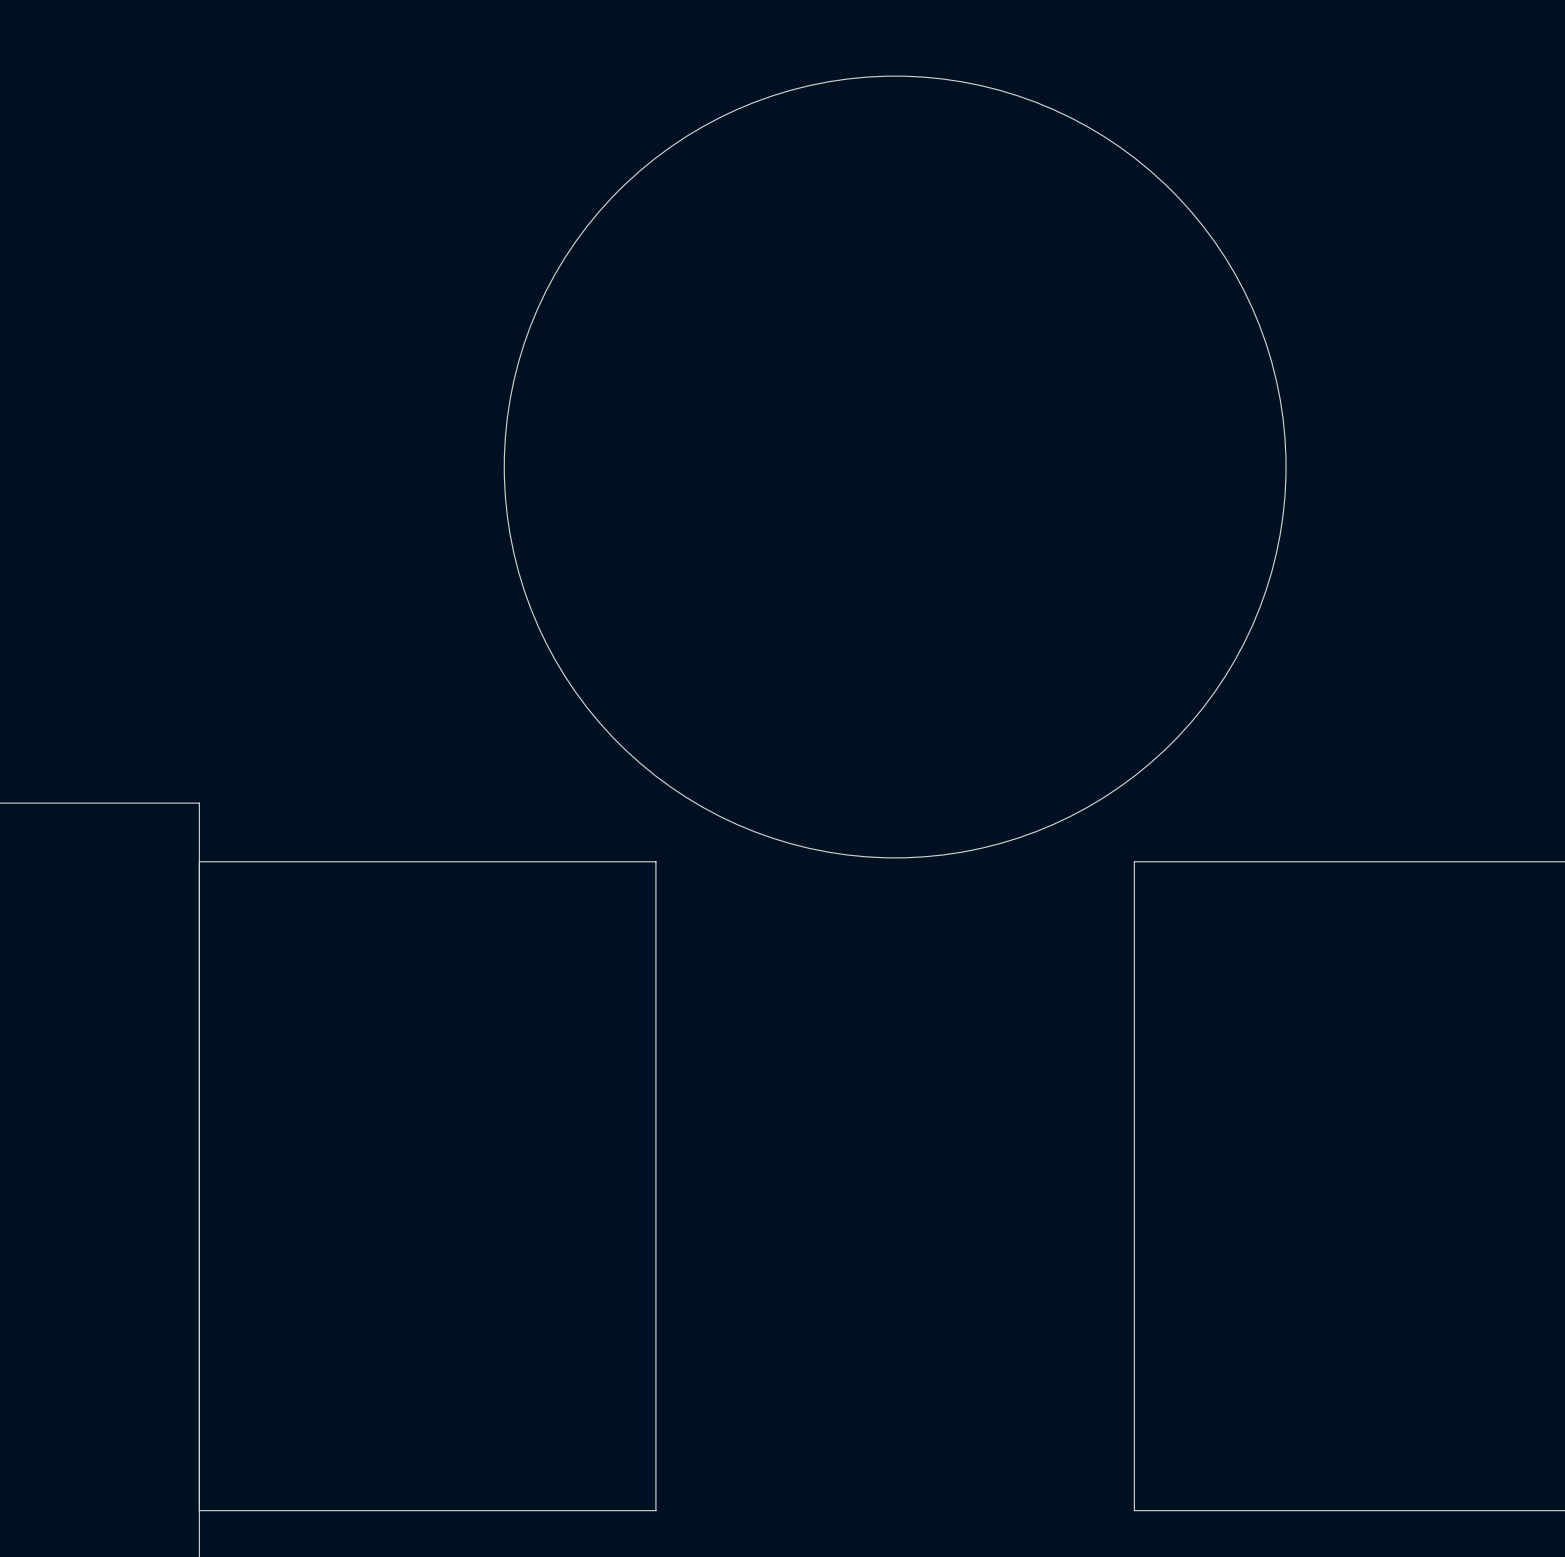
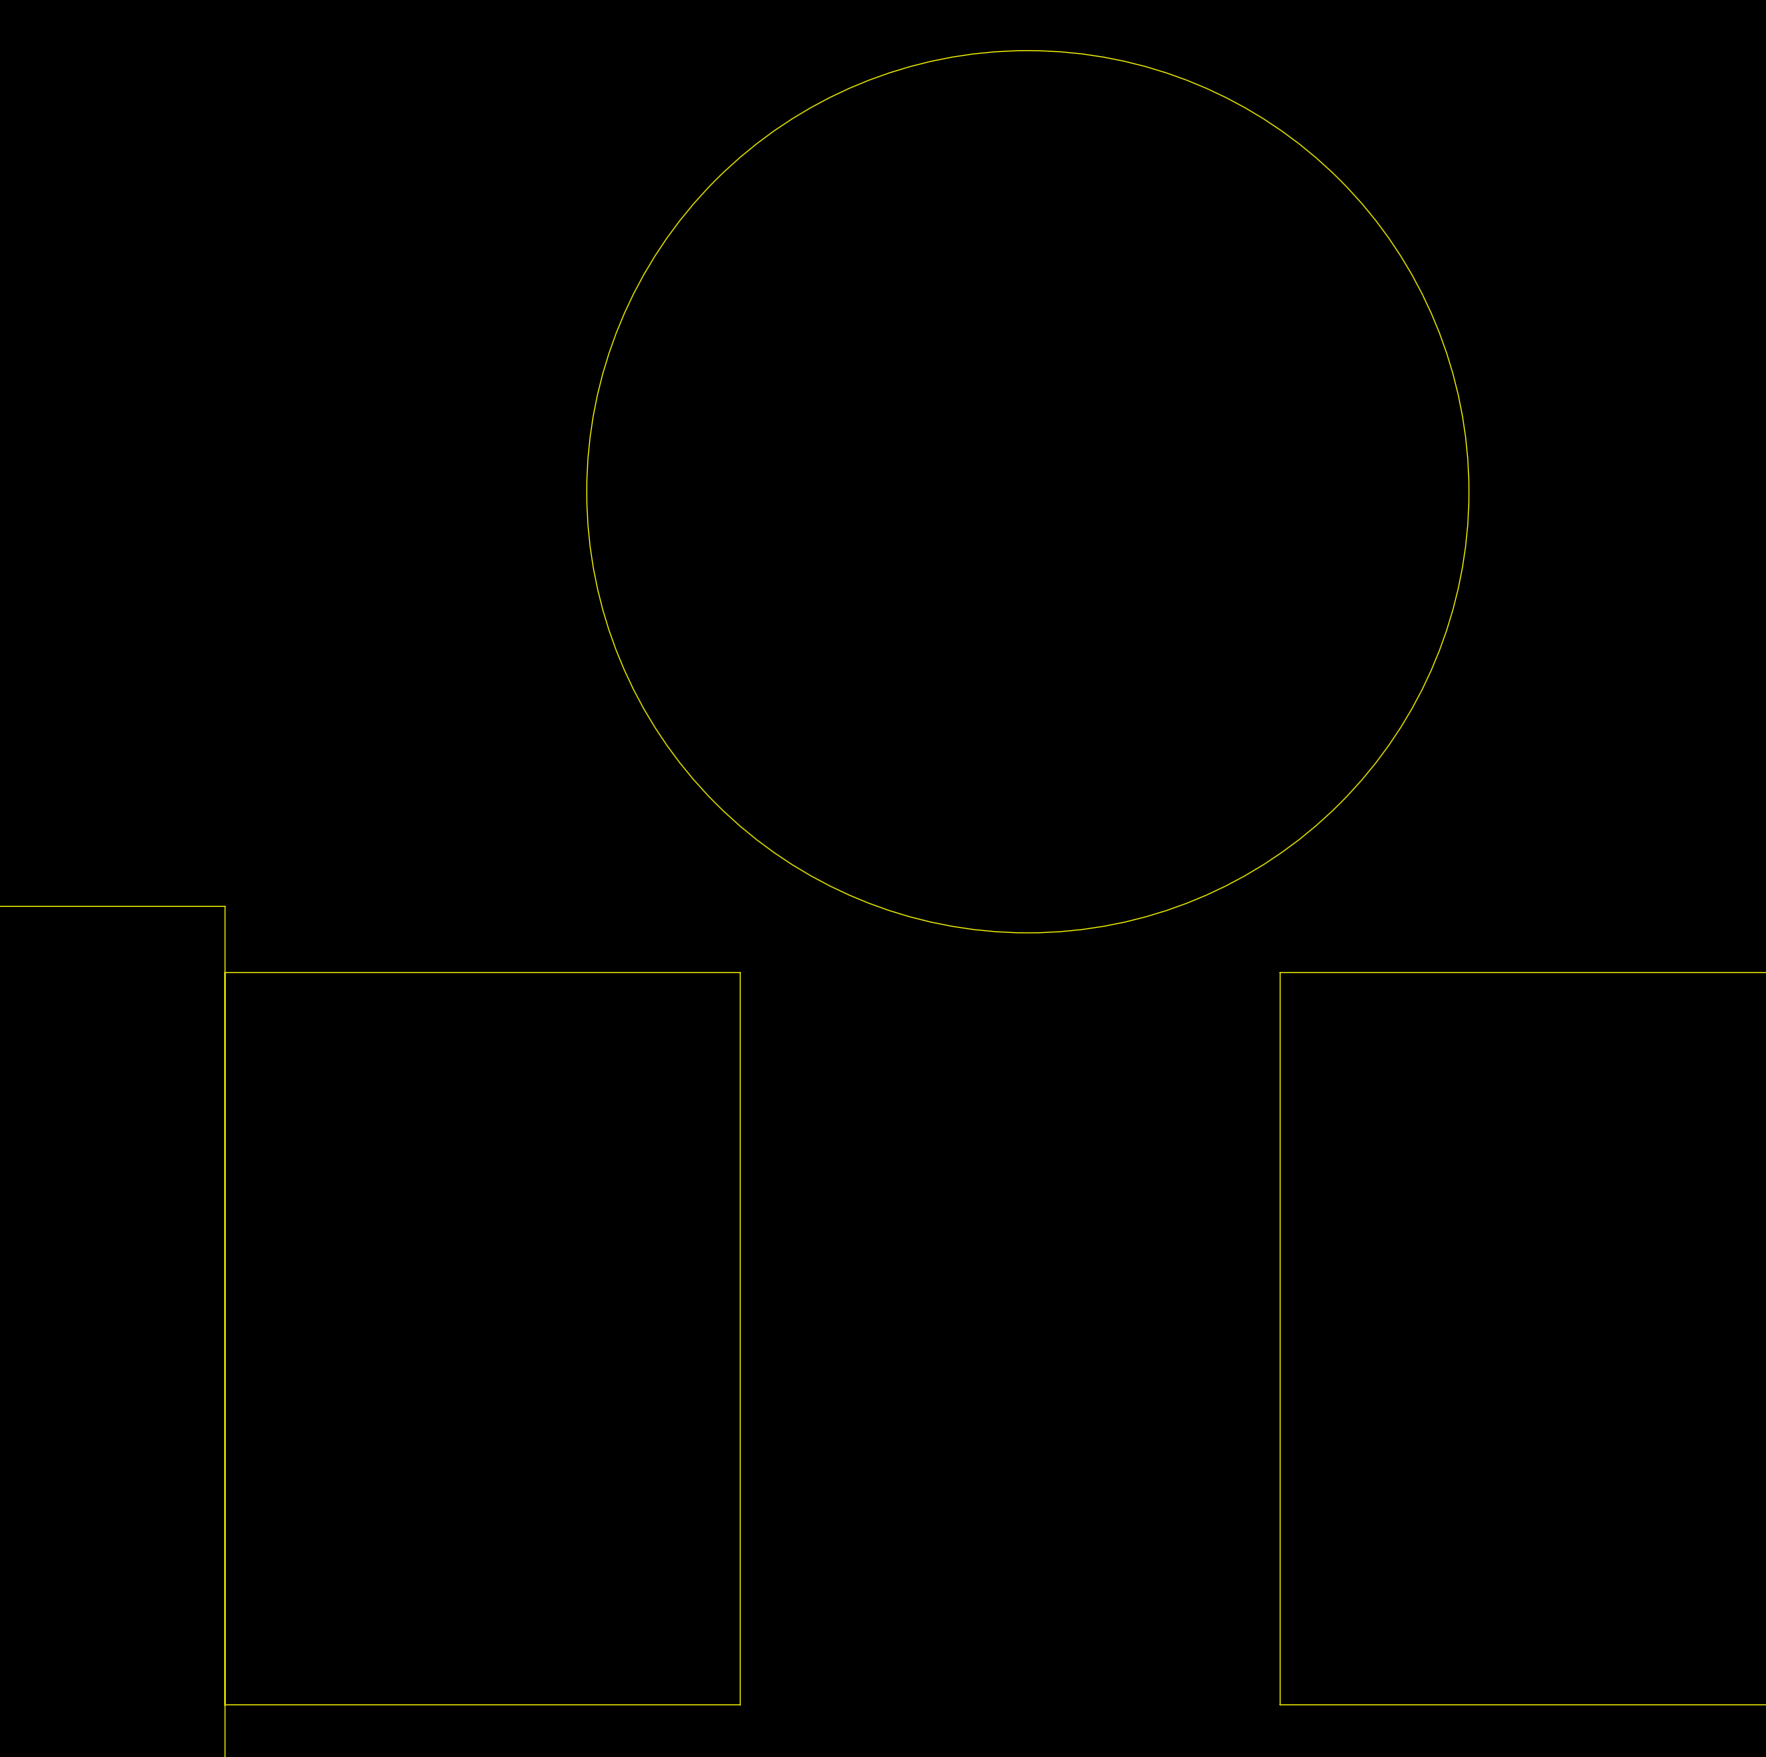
round board edge position: (895, 467) -> (1027, 491)

